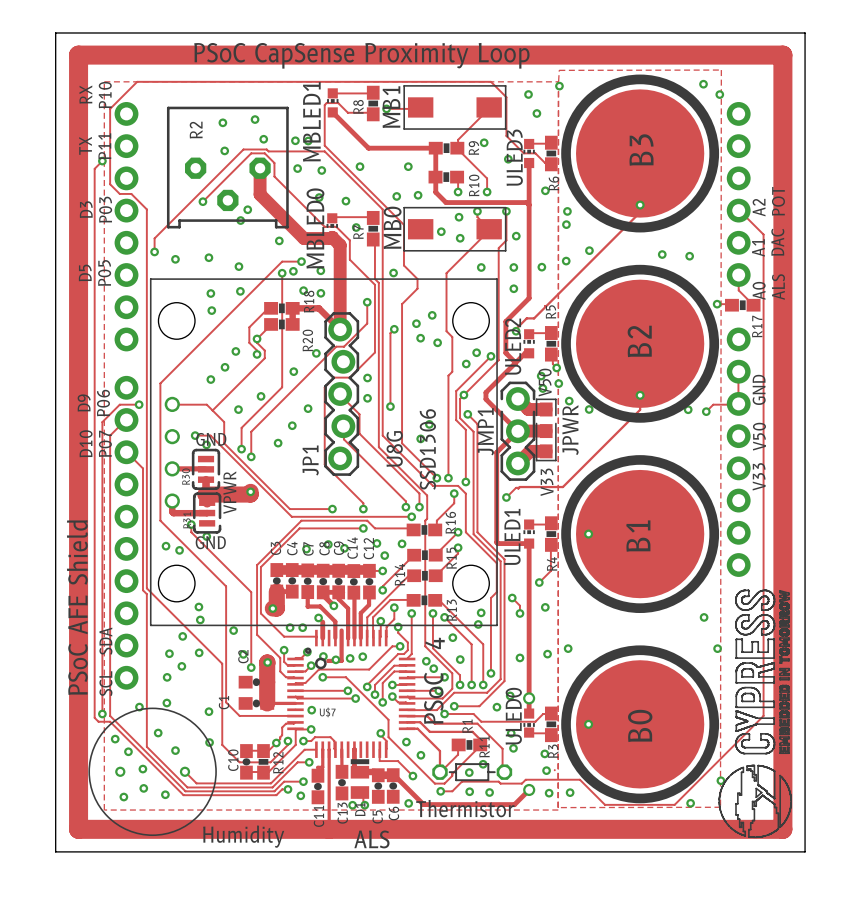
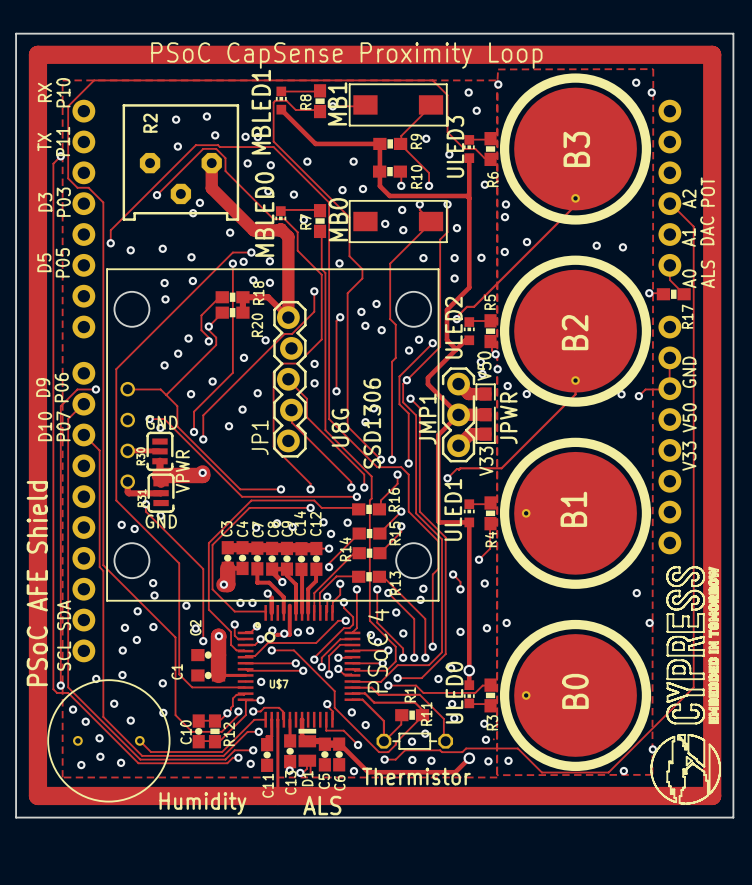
track: none -> (307, 760) (306, 768) (303, 772)
via position: (364, 805) -> (289, 770)

